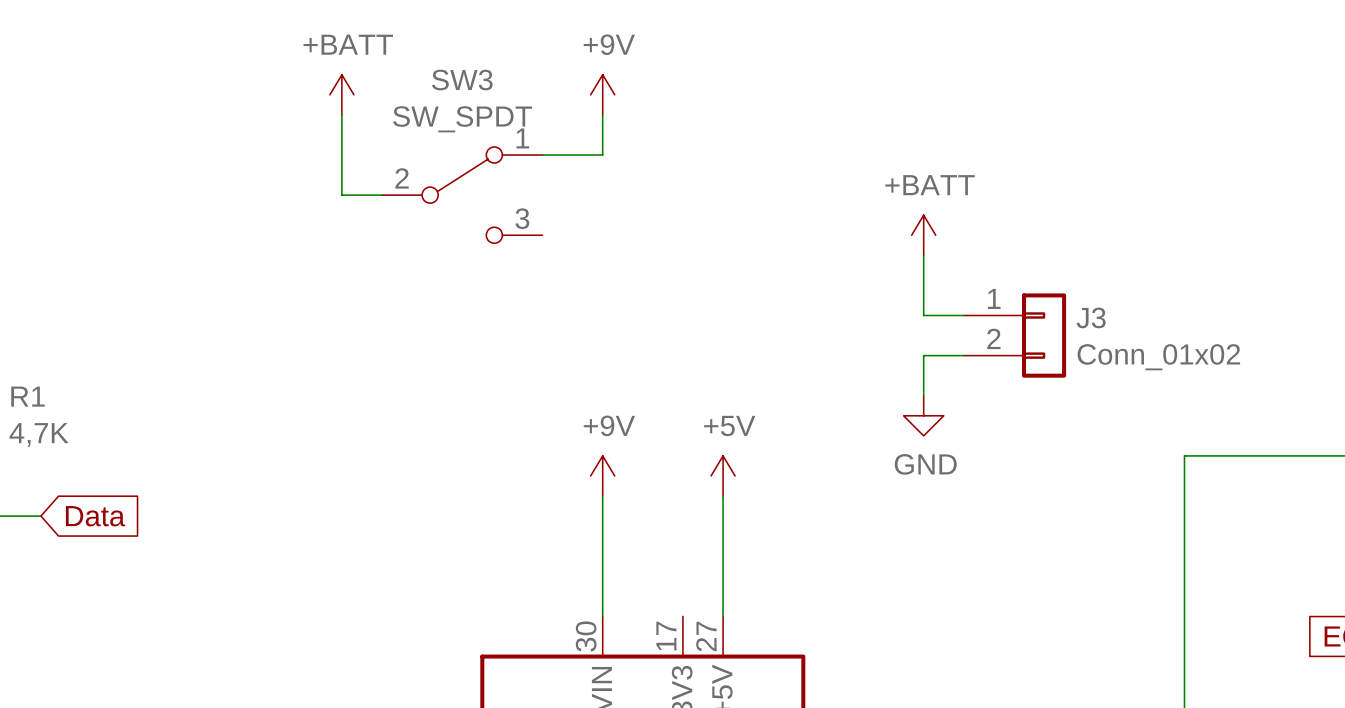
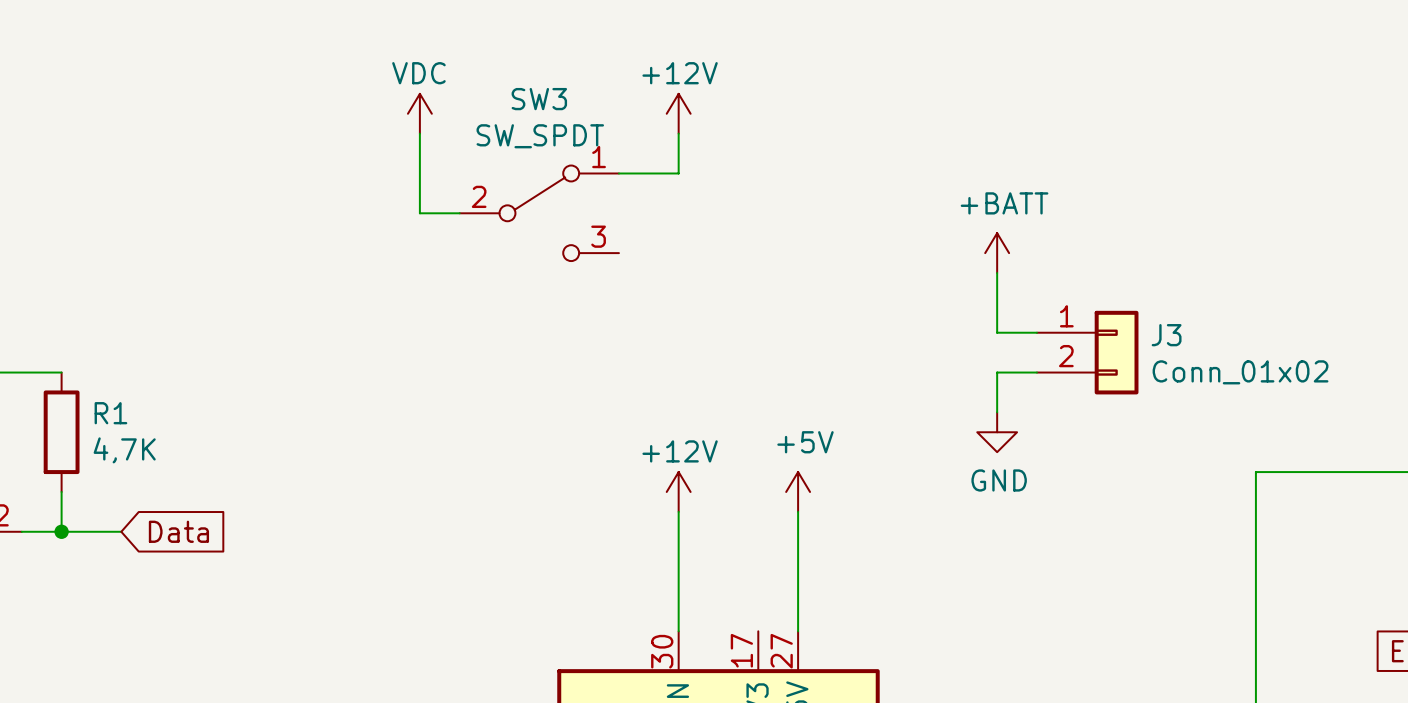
power symbol: +BATT (341, 94) -> VDC (419, 113)
power symbol: +9V (602, 94) -> +12V (678, 113)
power symbol: +9V (602, 475) -> +12V (678, 491)

